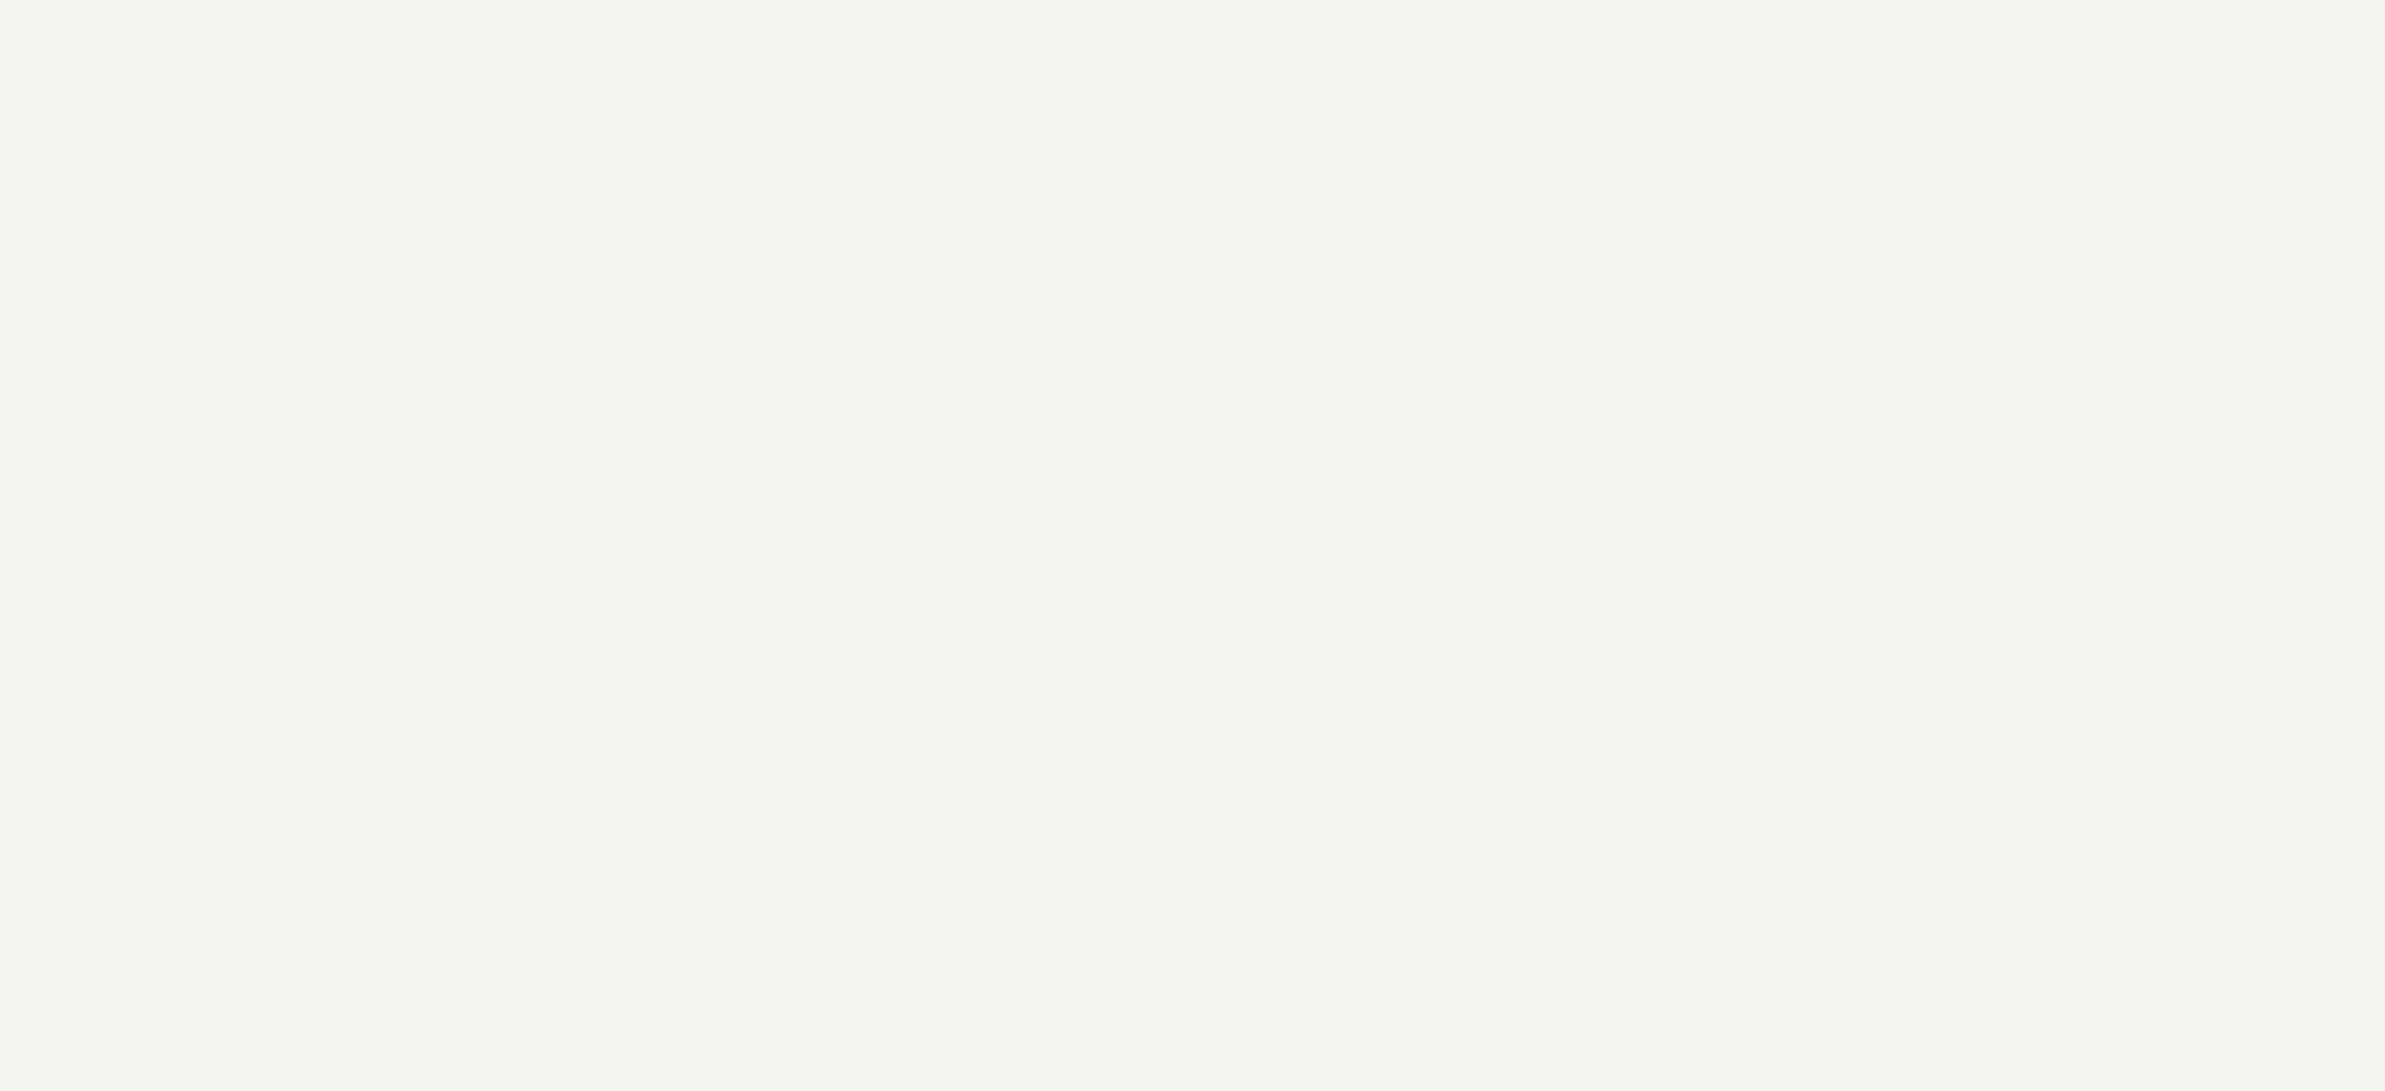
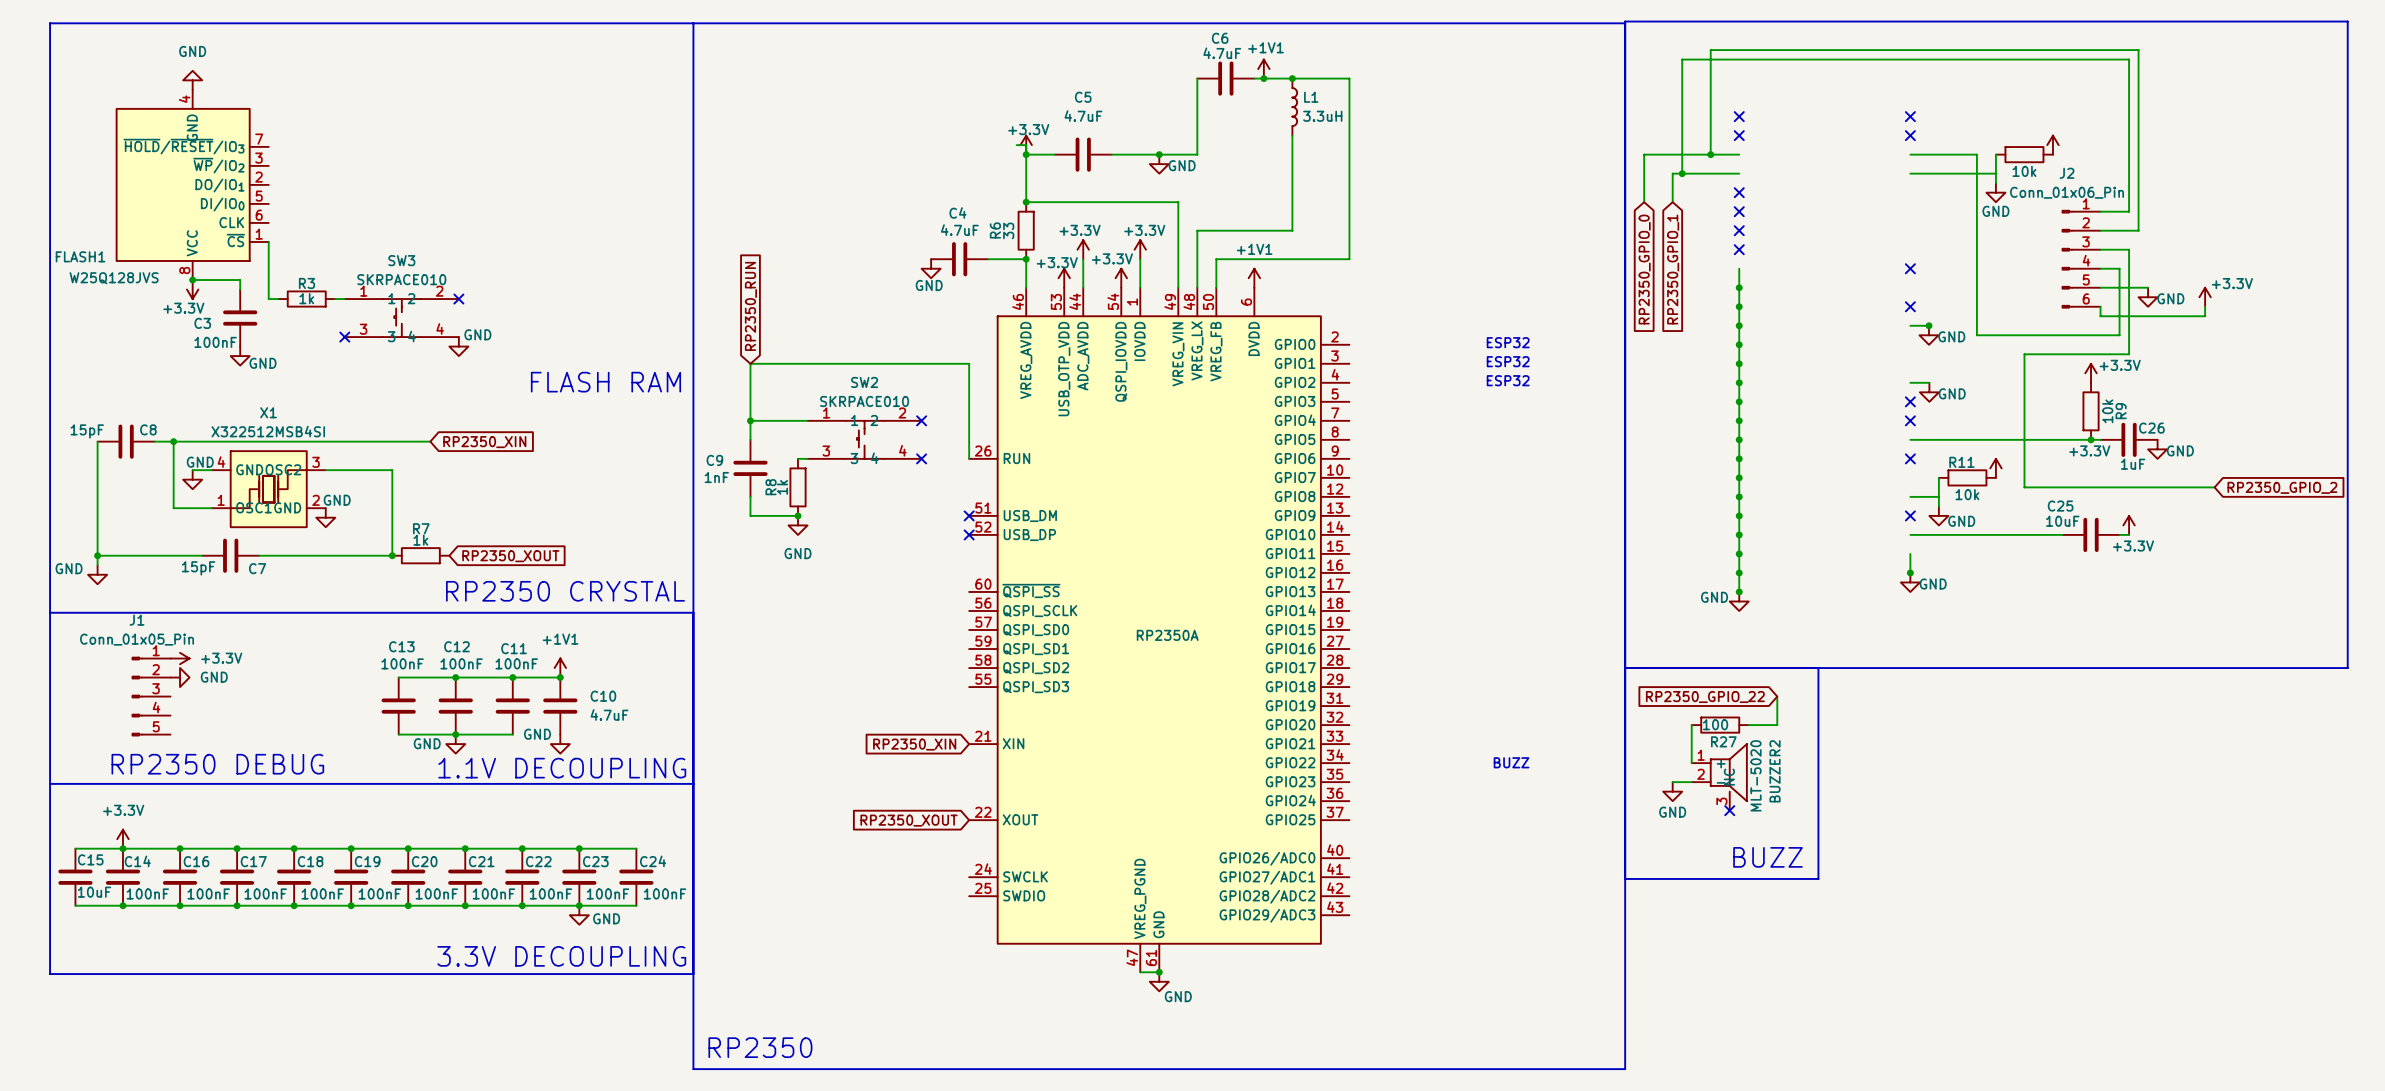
line: none -> (693, 23) (693, 1069) (1625, 1069) (1625, 21) (2347, 21) (2347, 668) (1625, 668)
line: none -> (1625, 23) (50, 23) (50, 974) (693, 974)
power symbol: none -> +1V1 (1263, 69)
wire: none -> (1197, 78) (1197, 154) (1111, 154)
C6: none -> 4.7uF (1225, 78)
wire: none -> (1254, 78) (1349, 78) (1349, 259) (1216, 259) (1216, 287)
junction: none -> (1263, 78)
junction: none -> (1292, 78)
power symbol: none -> GND (192, 80)
L1: none -> 3.3uH (1294, 107)
no-connect mark: none -> (1739, 116)
no-connect mark: none -> (1910, 116)
wire: none -> (1292, 135) (1292, 230) (1197, 230) (1197, 287)
no-connect mark: none -> (1739, 135)
no-connect mark: none -> (1910, 135)
wire: none -> (1016, 145) (1026, 145) (1026, 202) (1178, 202) (1178, 287)
power symbol: none -> +3.3V (1026, 145)
power symbol: none -> (2052, 145)
wire: none -> (1026, 154) (1054, 154)
junction: none -> (1026, 154)
C5: none -> 4.7uF (1083, 154)
junction: none -> (1159, 154)
wire: none -> (1710, 154) (1710, 50) (2138, 50) (2138, 230) (2100, 230)
junction: none -> (1710, 154)
wire: none -> (1739, 154) (1644, 154) (1644, 202)
wire: none -> (1910, 154) (1976, 154) (1976, 335) (2119, 335) (2119, 268) (2100, 268)
wire: none -> (1995, 154) (1995, 183)
part: none -> 10k (2024, 154)
power symbol: none -> GND (1159, 164)
wire: none -> (1682, 173) (1682, 59) (2129, 59) (2129, 211) (2100, 211)
junction: none -> (1682, 173)
wire: none -> (1739, 173) (1672, 173) (1672, 202)
wire: none -> (1910, 173) (1995, 173)
FLASH1: none -> W25Q128JVS (192, 184)
no-connect mark: none -> (1739, 192)
power symbol: none -> GND (1995, 192)
junction: none -> (1026, 202)
no-connect mark: none -> (1739, 211)
R6: none -> 33 (1026, 230)
no-connect mark: none -> (1739, 230)
wire: none -> (268, 241) (268, 299) (278, 299)
power symbol: none -> +3.3V (1083, 249)
power symbol: none -> +3.3V (1140, 249)
no-connect mark: none -> (1739, 249)
wire: none -> (2100, 249) (2129, 249) (2129, 354) (2024, 354) (2024, 487) (2214, 487)
C4: none -> 4.7uF (959, 259)
wire: none -> (988, 259) (1026, 259) (1026, 287)
junction: none -> (1026, 259)
wire: none -> (1083, 259) (1083, 287)
wire: none -> (1140, 259) (1140, 287)
J2: none -> Conn_01x06_Pin (2081, 259)
power symbol: none -> GND (931, 268)
wire: none -> (1739, 268) (1739, 591)
no-connect mark: none -> (1910, 268)
global label: none -> RP2350_GPIO_0 (1644, 269)
global label: none -> RP2350_GPIO_1 (1673, 269)
power symbol: none -> +3.3V (1064, 278)
power symbol: none -> +3.3V (1121, 278)
power symbol: none -> +1V1 (1254, 278)
wire: none -> (192, 280) (240, 280) (240, 289)
junction: none -> (192, 280)
junction: none -> (1739, 287)
wire: none -> (2100, 287) (2148, 287)
power symbol: none -> +3.3V (192, 289)
power symbol: none -> GND (2148, 297)
power symbol: none -> +3.3V (2205, 297)
R3: none -> 1k (306, 299)
wire: none -> (335, 299) (344, 299)
no-connect mark: none -> (458, 299)
global label: none -> RP2350_RUN (750, 306)
junction: none -> (1739, 306)
no-connect mark: none -> (1910, 306)
wire: none -> (2100, 306) (2100, 316) (2205, 316) (2205, 306)
C3: none -> 100nF (240, 318)
SW3: none -> SKRPACE010 (401, 318)
junction: none -> (1739, 325)
wire: none -> (1910, 325) (1929, 325)
junction: none -> (1929, 325)
power symbol: none -> GND (1929, 335)
no-connect mark: none -> (344, 337)
text: none -> ESP32 (1508, 342)
junction: none -> (1739, 344)
power symbol: none -> GND (458, 346)
power symbol: none -> GND (240, 356)
text: none -> ESP32 (1508, 361)
junction: none -> (1739, 363)
power symbol: none -> +3.3V (2091, 373)
text: none -> ESP32 (1508, 380)
text: none -> FLASH RAM (605, 382)
junction: none -> (1739, 382)
wire: none -> (1910, 382) (1929, 382)
power symbol: none -> GND (1929, 392)
junction: none -> (1739, 401)
no-connect mark: none -> (1910, 401)
R9: none -> 10k (2091, 411)
wire: none -> (750, 420) (807, 420)
junction: none -> (750, 420)
no-connect mark: none -> (921, 420)
junction: none -> (1739, 420)
no-connect mark: none -> (1910, 420)
wire: none -> (750, 439) (750, 363) (969, 363) (969, 458)
SW2: none -> SKRPACE010 (864, 439)
junction: none -> (1739, 439)
wire: none -> (1910, 439) (2100, 439)
junction: none -> (2091, 439)
C26: none -> 1uF (2129, 439)
wire: none -> (97, 441) (97, 565)
C8: none -> 15pF (126, 441)
wire: none -> (154, 441) (430, 441)
wire: none -> (173, 441) (173, 508) (211, 508)
junction: none -> (173, 441)
global label: none -> RP2350_XIN (484, 442)
power symbol: none -> GND (2157, 449)
wire: none -> (798, 458) (807, 458)
no-connect mark: none -> (921, 458)
junction: none -> (1739, 458)
no-connect mark: none -> (1910, 458)
C9: none -> 1nF (750, 468)
power symbol: none -> +3.3V (1995, 468)
wire: none -> (192, 470) (211, 470)
wire: none -> (325, 470) (392, 470) (392, 555) (259, 555)
junction: none -> (1739, 477)
wire: none -> (1938, 477) (1938, 506)
R11: none -> 10k (1967, 477)
power symbol: none -> GND (192, 479)
R8: none -> 1k (798, 487)
global label: none -> RP2350_GPIO_2 (2282, 487)
X1: none -> X322512MSB4SI (268, 489)
wire: none -> (750, 496) (750, 515) (798, 515)
junction: none -> (1739, 496)
wire: none -> (1910, 496) (1938, 496)
junction: none -> (798, 515)
no-connect mark: none -> (969, 515)
junction: none -> (1739, 515)
no-connect mark: none -> (1910, 515)
power symbol: none -> GND (1938, 515)
power symbol: none -> GND (325, 517)
power symbol: none -> GND (798, 525)
power symbol: none -> +3.3V (2129, 525)
no-connect mark: none -> (969, 534)
junction: none -> (1739, 534)
wire: none -> (1910, 534) (2062, 534)
C25: none -> 10uF (2091, 534)
wire: none -> (2119, 534) (2129, 534)
junction: none -> (1739, 553)
wire: none -> (1910, 553) (1910, 572)
wire: none -> (97, 555) (202, 555)
junction: none -> (97, 555)
C7: none -> 15pF (230, 555)
junction: none -> (392, 555)
R7: none -> 1k (420, 555)
global label: none -> RP2350_XOUT (510, 556)
junction: none -> (1739, 572)
junction: none -> (1910, 572)
power symbol: none -> GND (97, 574)
power symbol: none -> GND (1910, 582)
text: none -> RP2350 CRYSTAL (565, 591)
junction: none -> (1739, 591)
power symbol: none -> GND (1739, 601)
line: none -> (50, 612) (693, 612)
part: none -> RP2350A (1159, 630)
power symbol: none -> +3.3V (180, 658)
power symbol: none -> +1V1 (560, 668)
line: none -> (1818, 668) (1818, 878) (1625, 878)
power symbol: none -> GND (180, 677)
wire: none -> (398, 677) (560, 677)
junction: none -> (455, 677)
junction: none -> (512, 677)
junction: none -> (560, 677)
J1: none -> Conn_01x05_Pin (151, 696)
wire: none -> (1777, 696) (1777, 725) (1748, 725)
global label: none -> RP2350_GPIO_22 (1705, 697)
C13: none -> 100nF (398, 706)
C12: none -> 100nF (455, 706)
C11: none -> 100nF (512, 706)
C10: none -> 4.7uF (560, 706)
wire: none -> (1691, 725) (1691, 763)
R27: none -> 100 (1720, 725)
wire: none -> (398, 734) (512, 734)
junction: none -> (455, 734)
power symbol: none -> GND (455, 744)
power symbol: none -> GND (560, 744)
global label: none -> RP2350_XIN (914, 744)
text: none -> BUZZ (1511, 762)
text: none -> RP2350 DEBUG (217, 764)
text: none -> 1.1V DECOUPLING (562, 768)
BUZZER2: none -> MLT-5020 (1719, 777)
wire: none -> (1672, 782) (1691, 782)
line: none -> (50, 783) (693, 783)
power symbol: none -> GND (1672, 791)
no-connect mark: none -> (1729, 810)
global label: none -> RP2350_XOUT (909, 820)
power symbol: none -> +3.3V (122, 839)
wire: none -> (75, 848) (636, 848)
junction: none -> (122, 848)
junction: none -> (180, 848)
junction: none -> (237, 848)
junction: none -> (294, 848)
junction: none -> (351, 848)
junction: none -> (408, 848)
junction: none -> (465, 848)
junction: none -> (522, 848)
junction: none -> (579, 848)
text: none -> BUZZ (1768, 857)
C15: none -> 10uF (75, 877)
C14: none -> 100nF (122, 877)
C16: none -> 100nF (180, 877)
C17: none -> 100nF (237, 877)
C18: none -> 100nF (294, 877)
C19: none -> 100nF (351, 877)
C20: none -> 100nF (408, 877)
C21: none -> 100nF (465, 877)
C22: none -> 100nF (522, 877)
C23: none -> 100nF (579, 877)
C24: none -> 100nF (636, 877)
wire: none -> (75, 905) (636, 905)
junction: none -> (122, 905)
junction: none -> (180, 905)
junction: none -> (237, 905)
junction: none -> (294, 905)
junction: none -> (351, 905)
junction: none -> (408, 905)
junction: none -> (465, 905)
junction: none -> (522, 905)
junction: none -> (579, 905)
power symbol: none -> GND (579, 915)
text: none -> 3.3V DECOUPLING (561, 956)
wire: none -> (1140, 972) (1159, 972)
junction: none -> (1159, 972)
power symbol: none -> GND (1159, 981)
text: none -> RP2350 (760, 1047)

